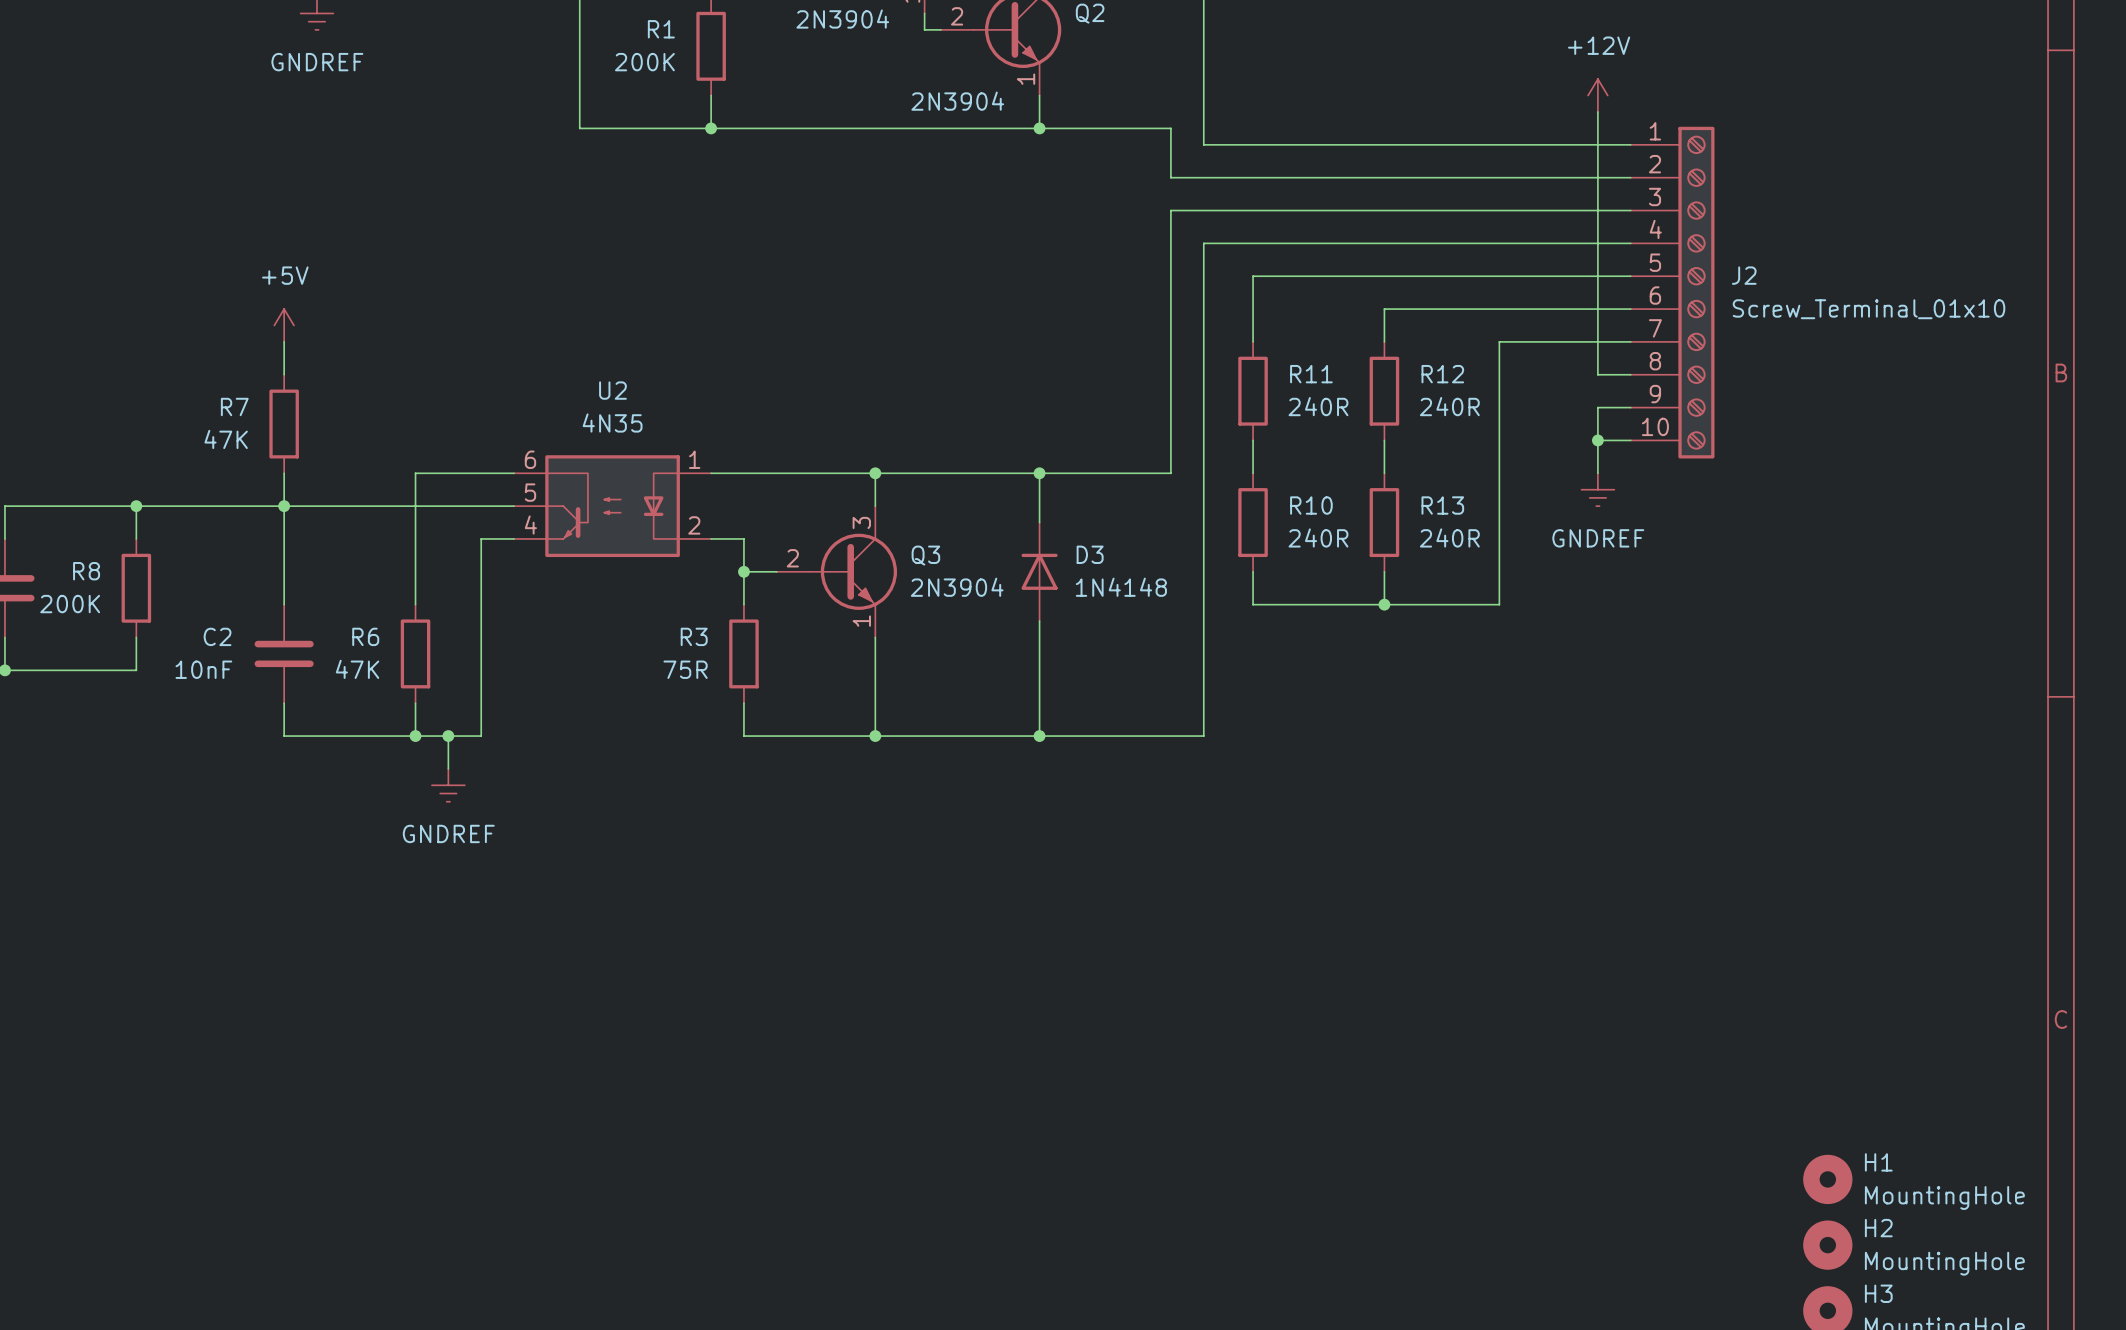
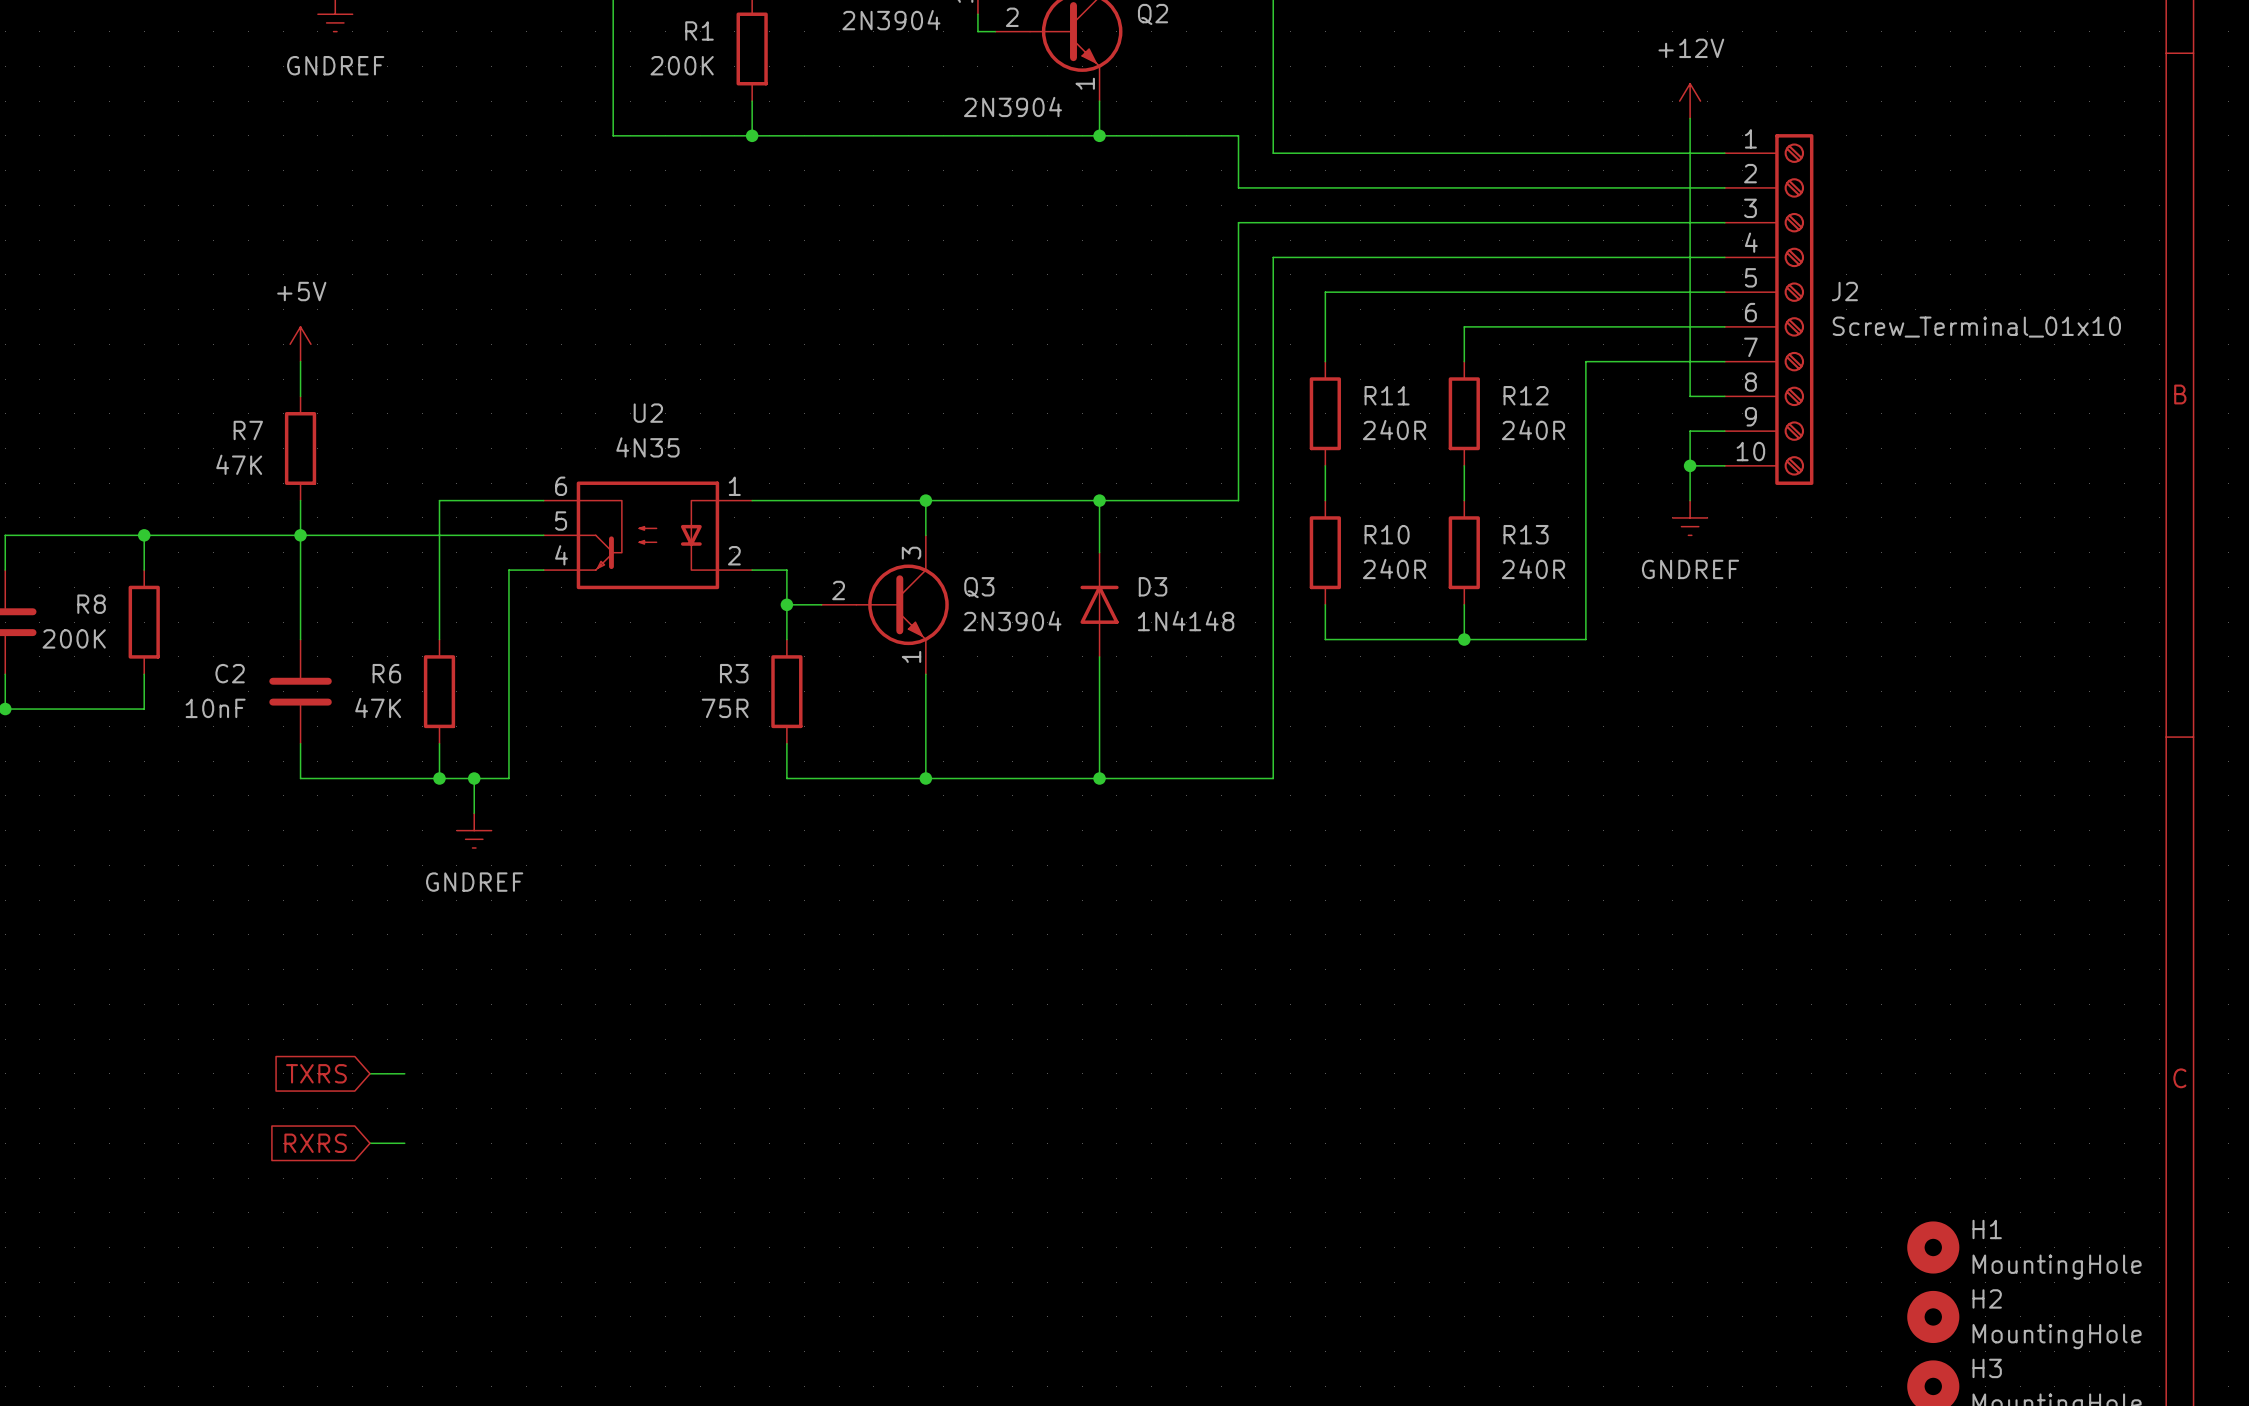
global label: none -> TXRS (316, 1073)
wire: none -> (370, 1073) (404, 1073)
global label: none -> RXRS (315, 1143)
wire: none -> (370, 1143) (404, 1143)

